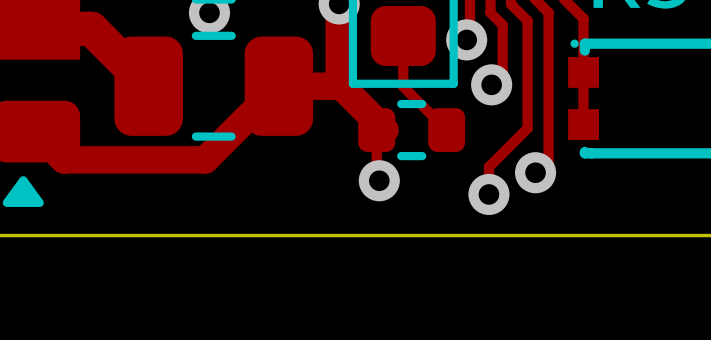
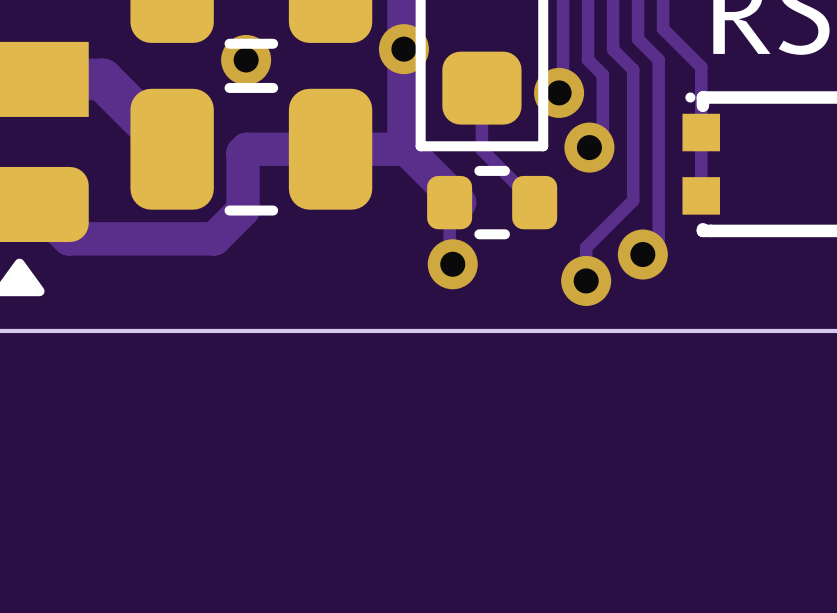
track: (278, 86) (205, 159) (183, 159) -> (330, 149) (246, 149) (243, 153) (243, 210) (214, 238)

